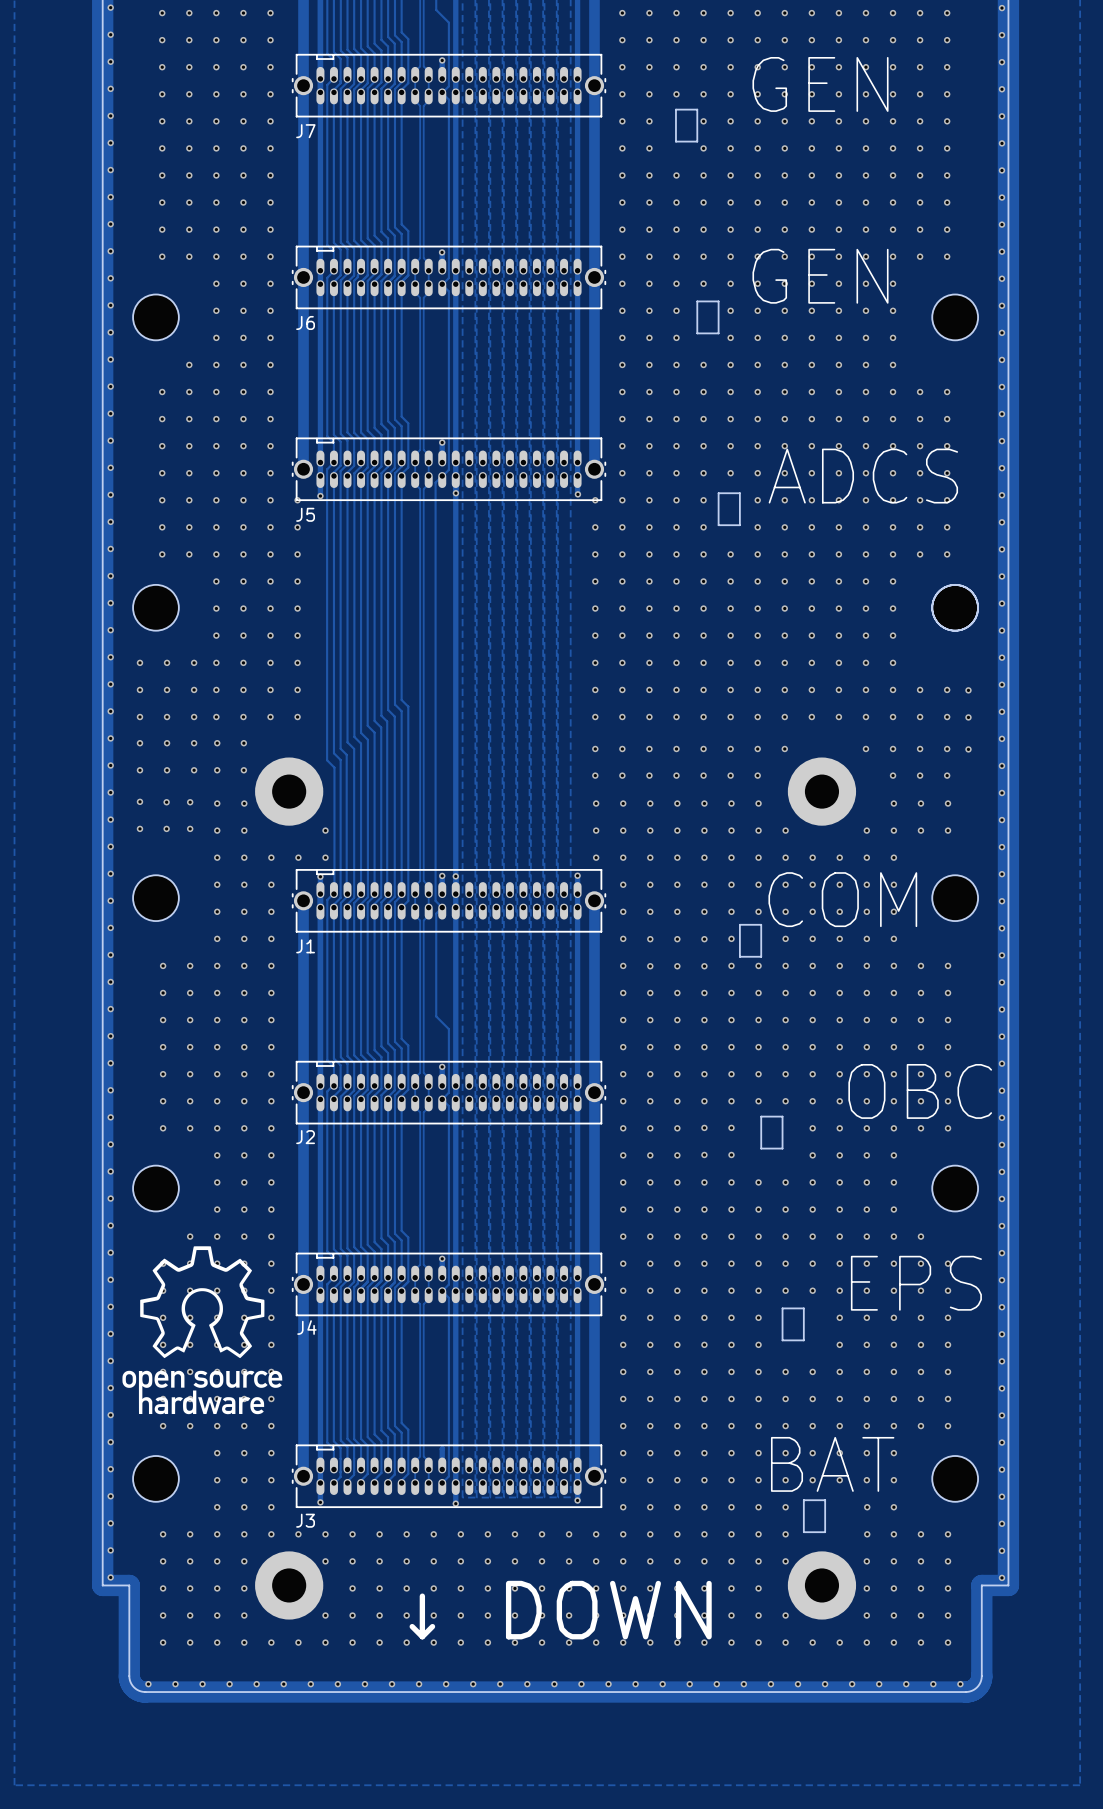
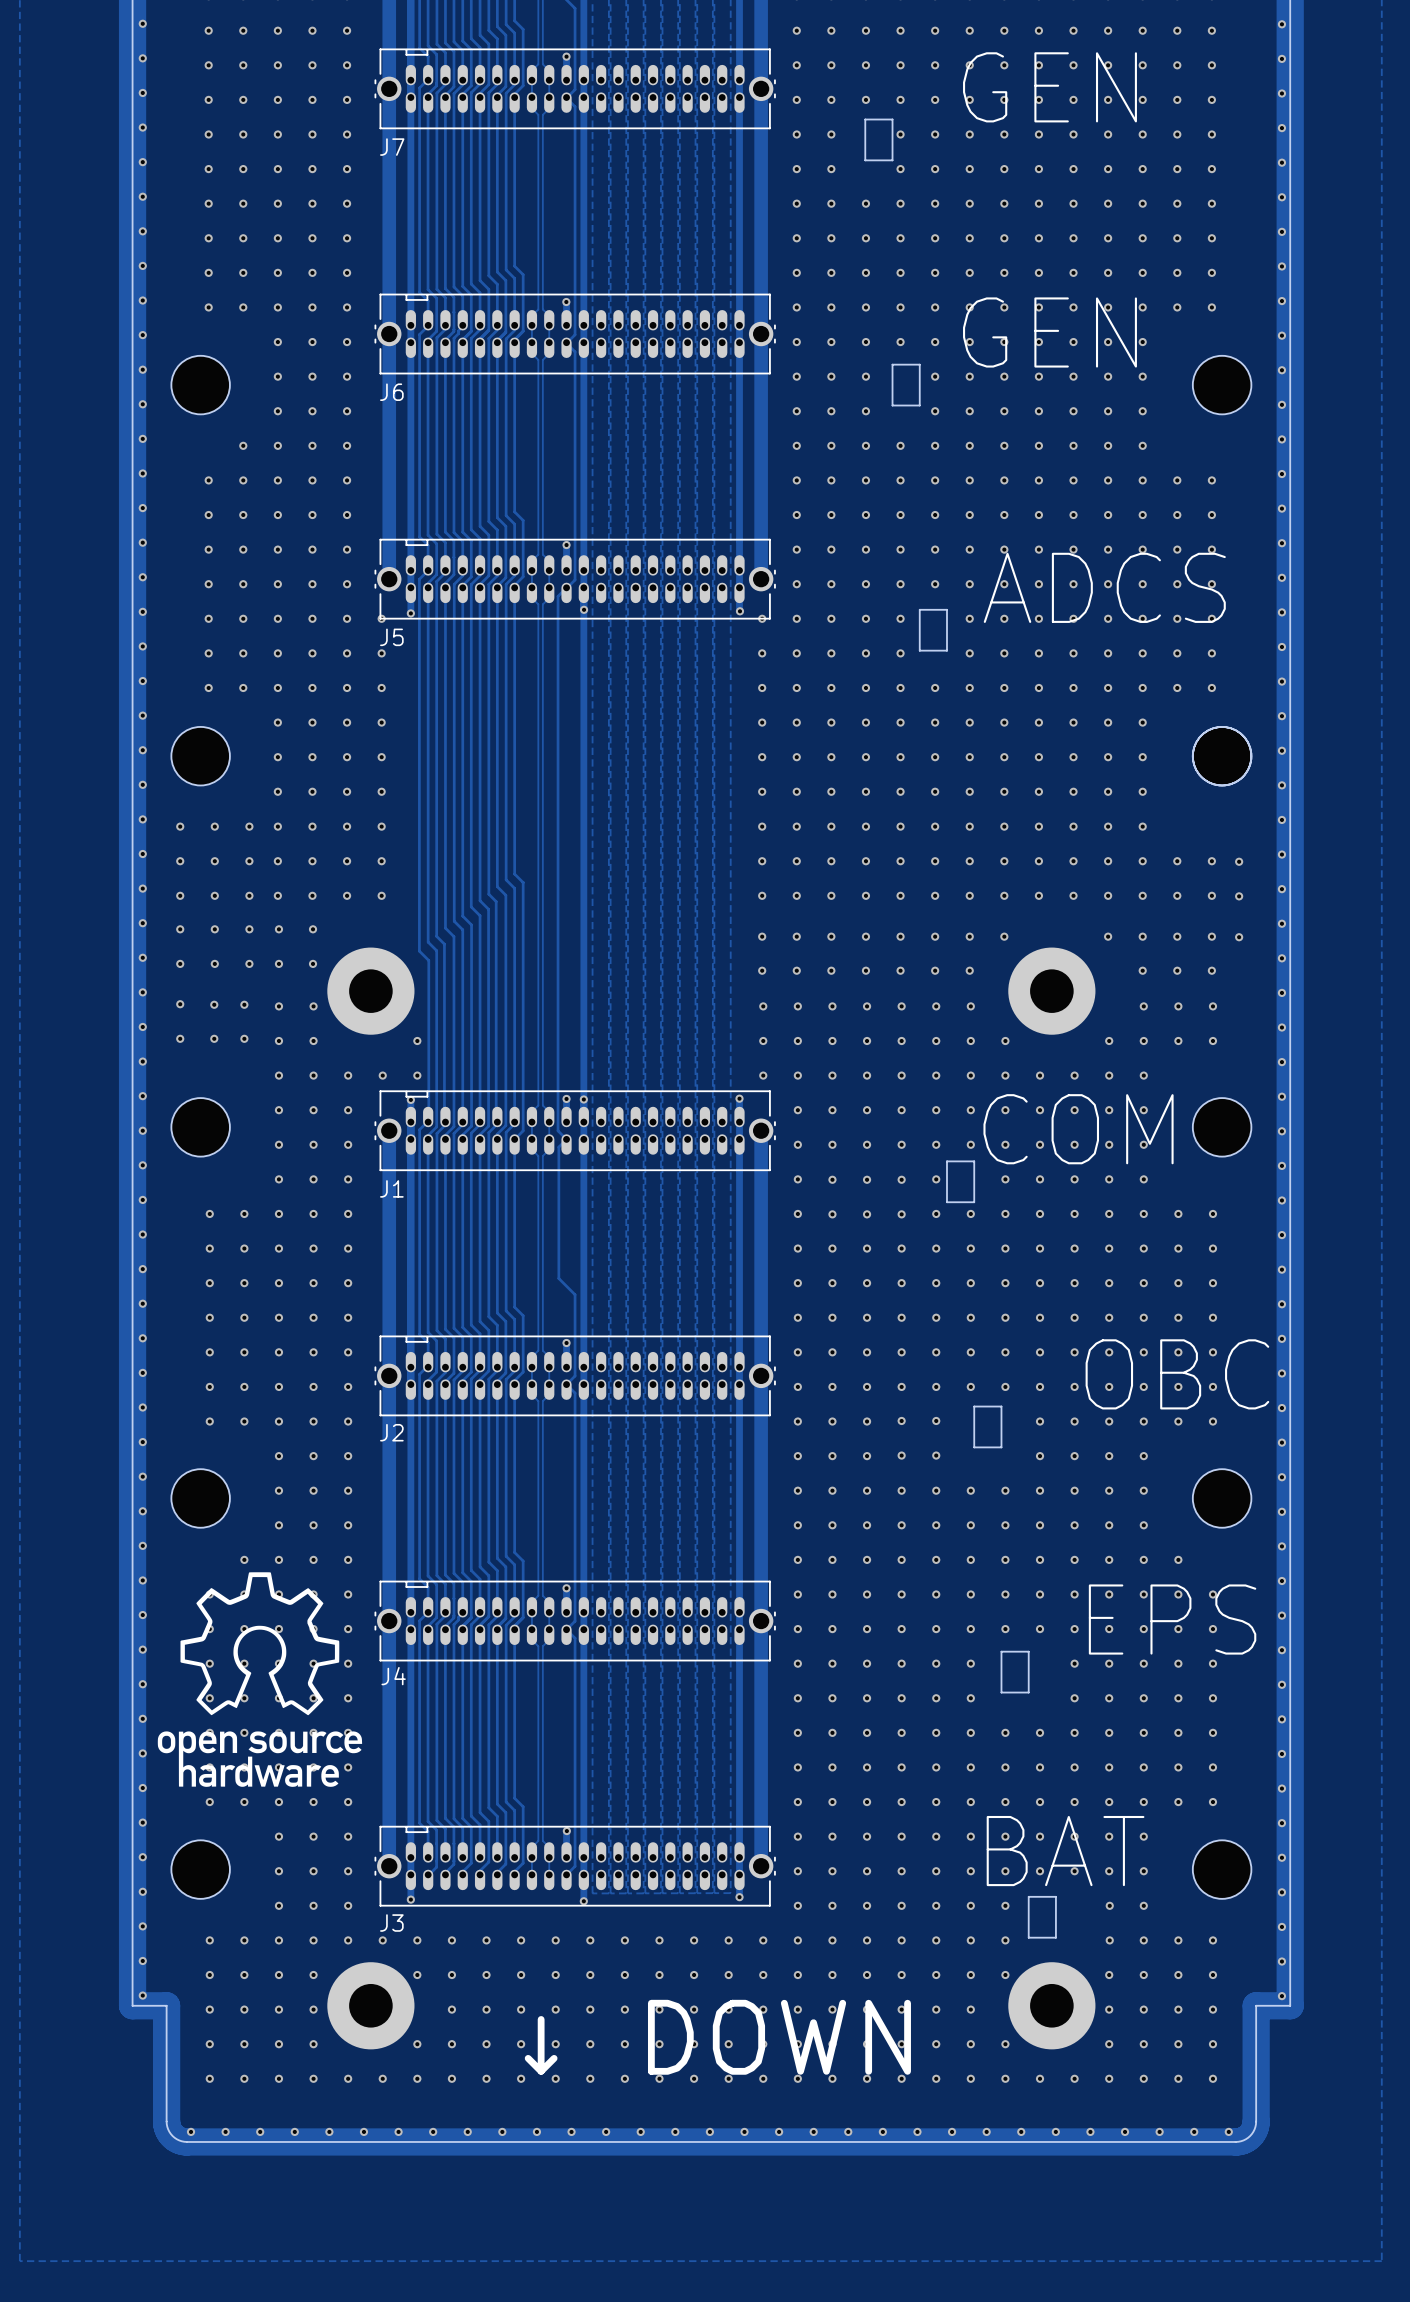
via: none -> (566, 1831)

